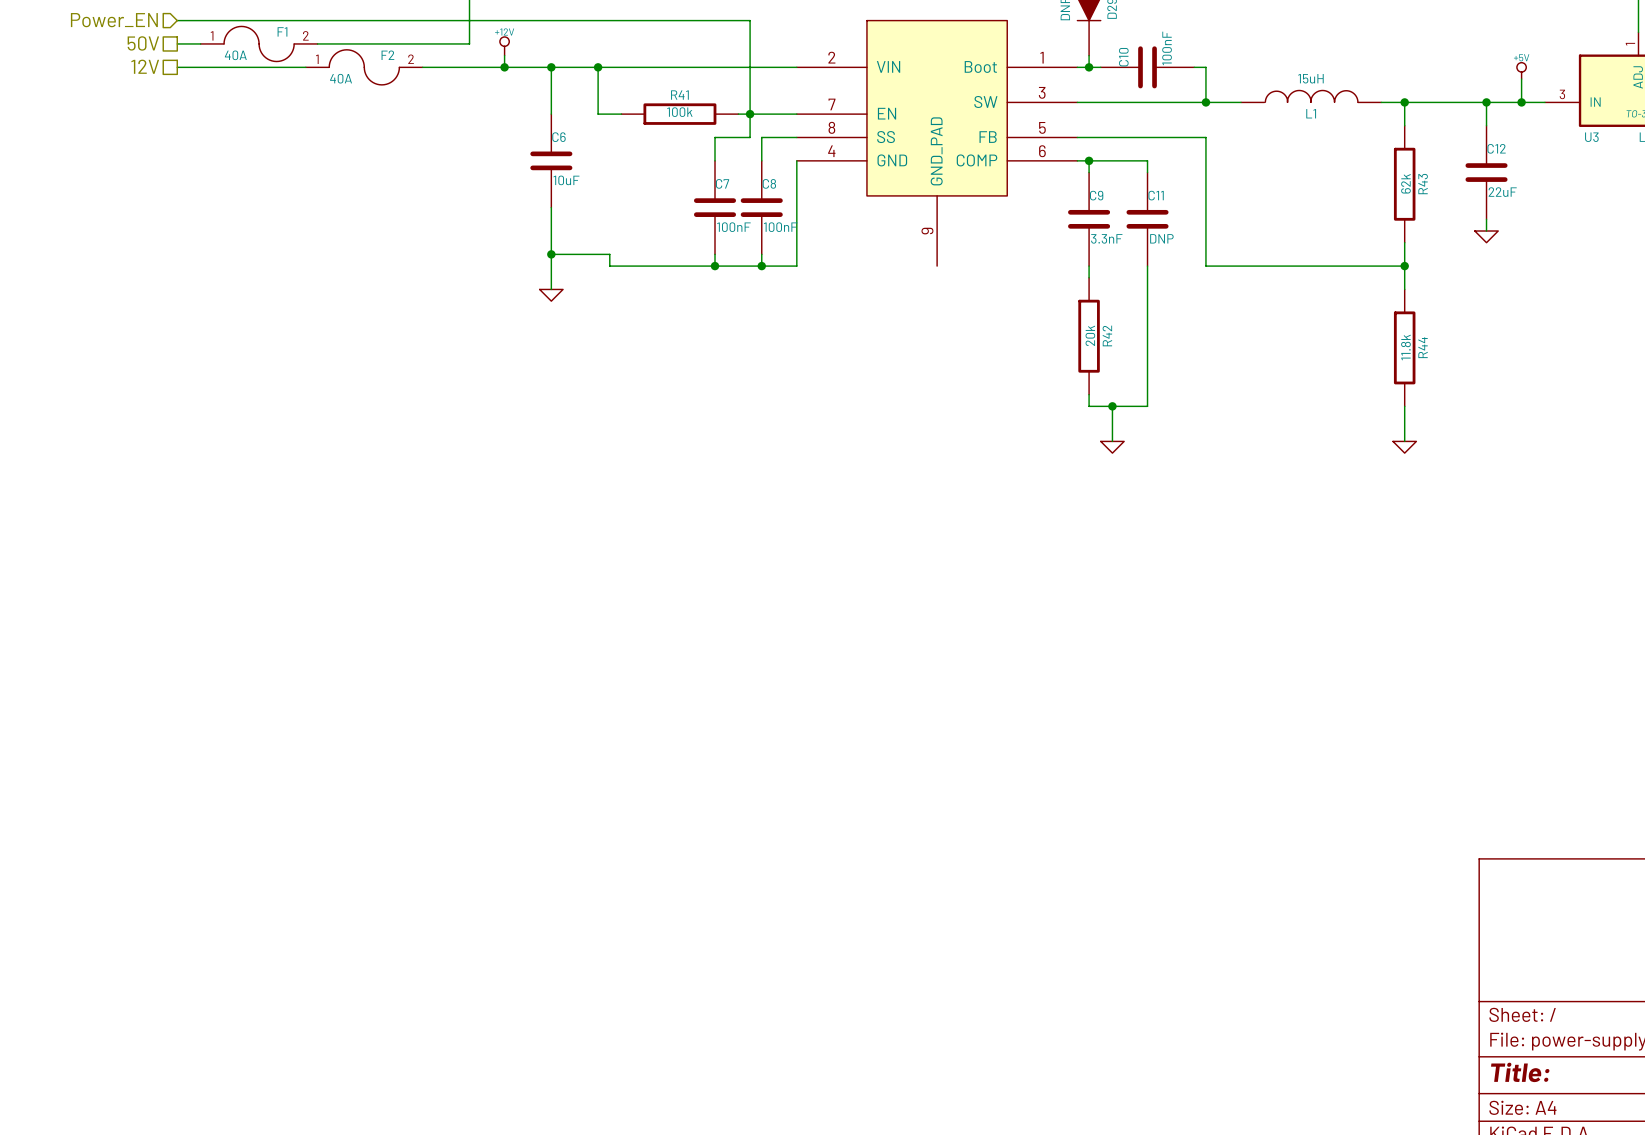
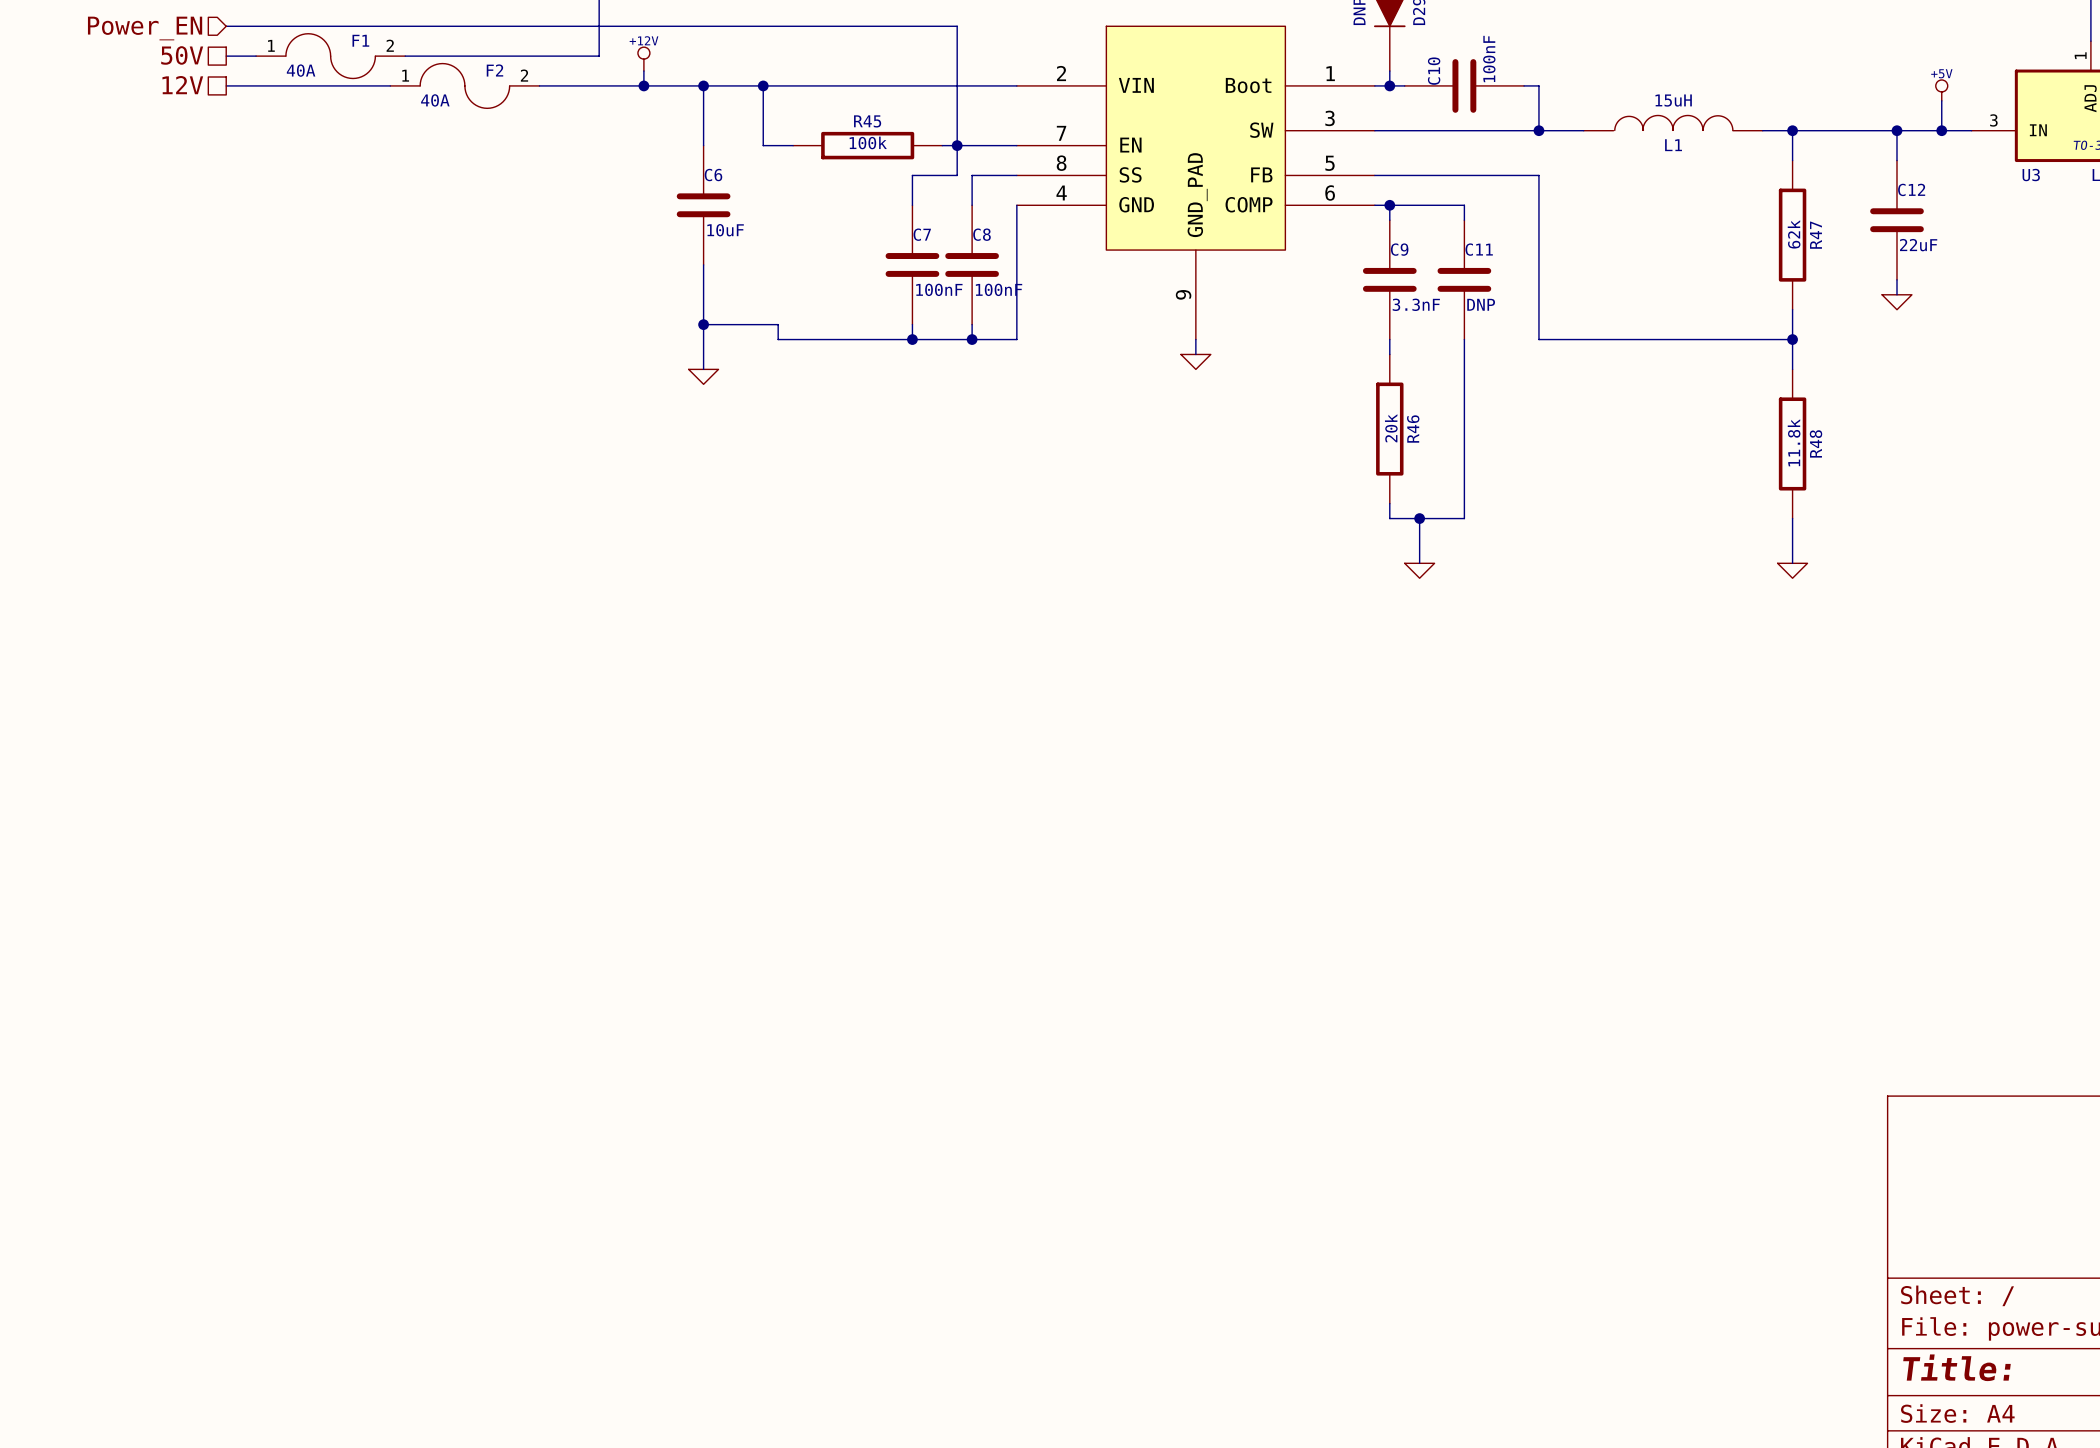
R41 name: R41 (679, 95) -> R45 (867, 121)
R43 name: R43 (1423, 184) -> R47 (1815, 235)
wire: none -> (1195, 339) (1195, 354)
power symbol: none -> (1195, 361)
R42 name: R42 (1107, 335) -> R46 (1413, 429)
R44 name: R44 (1423, 347) -> R48 (1816, 443)

